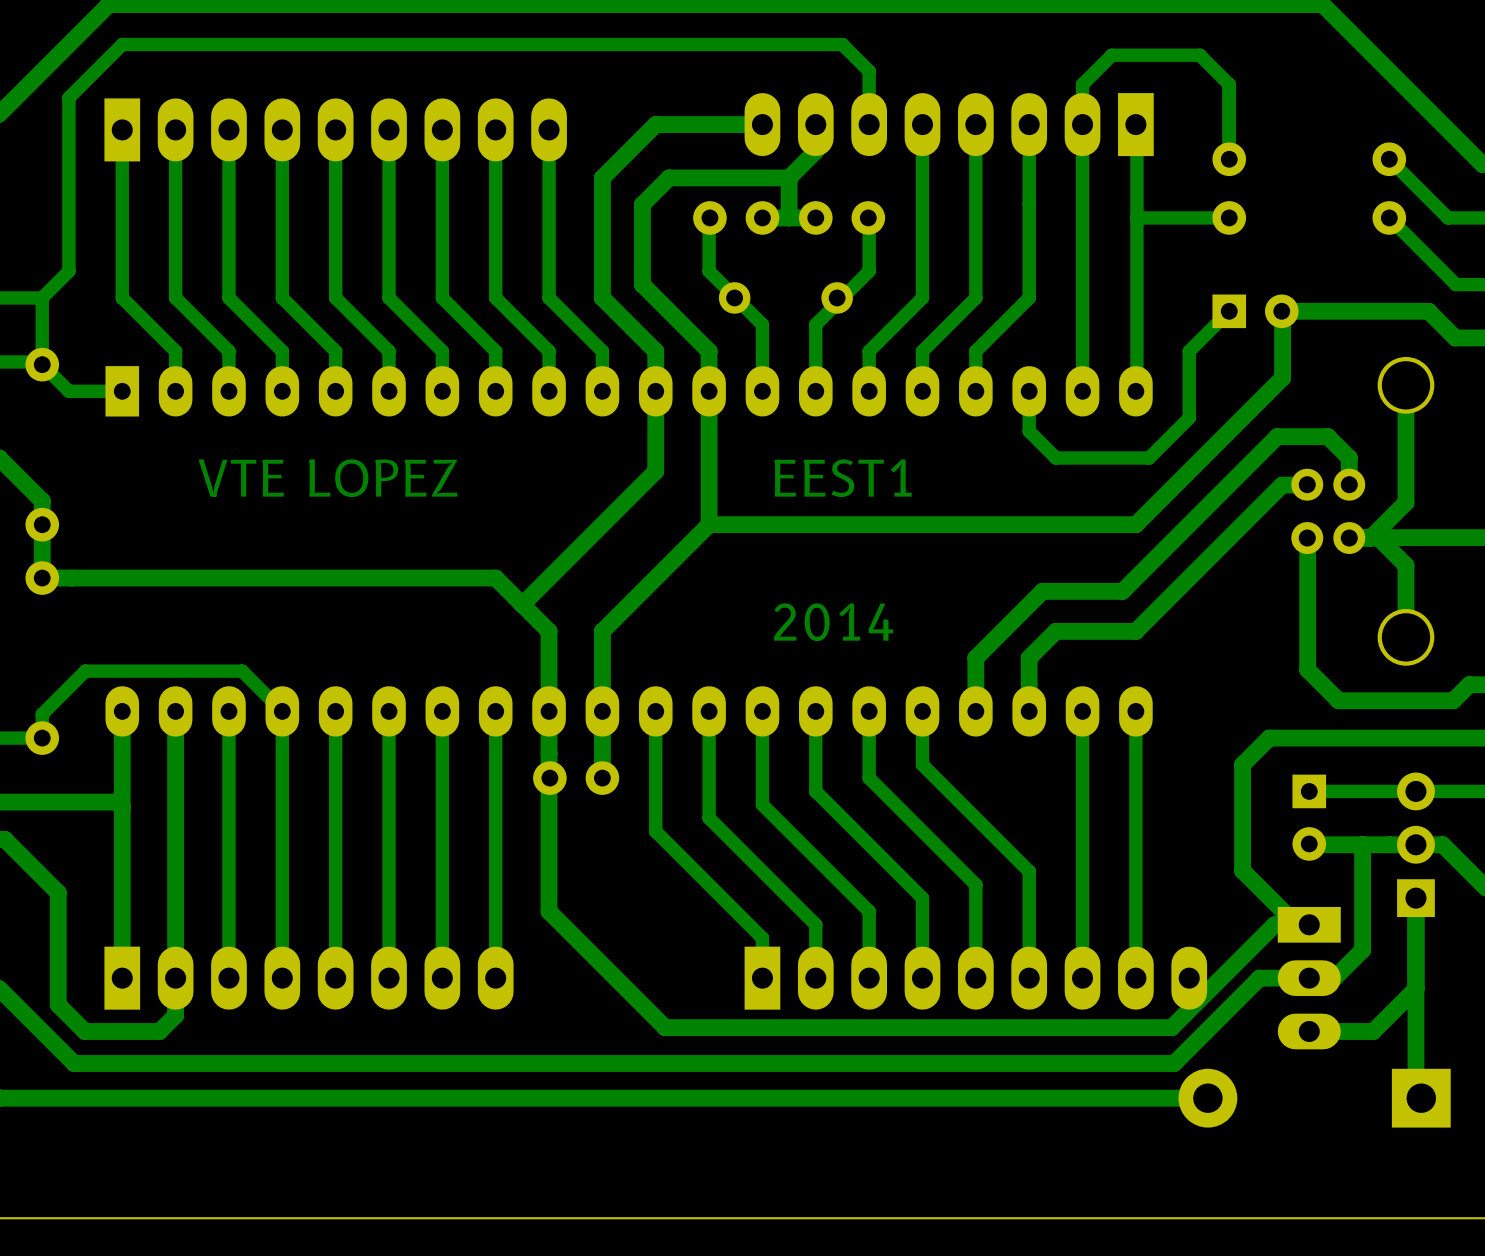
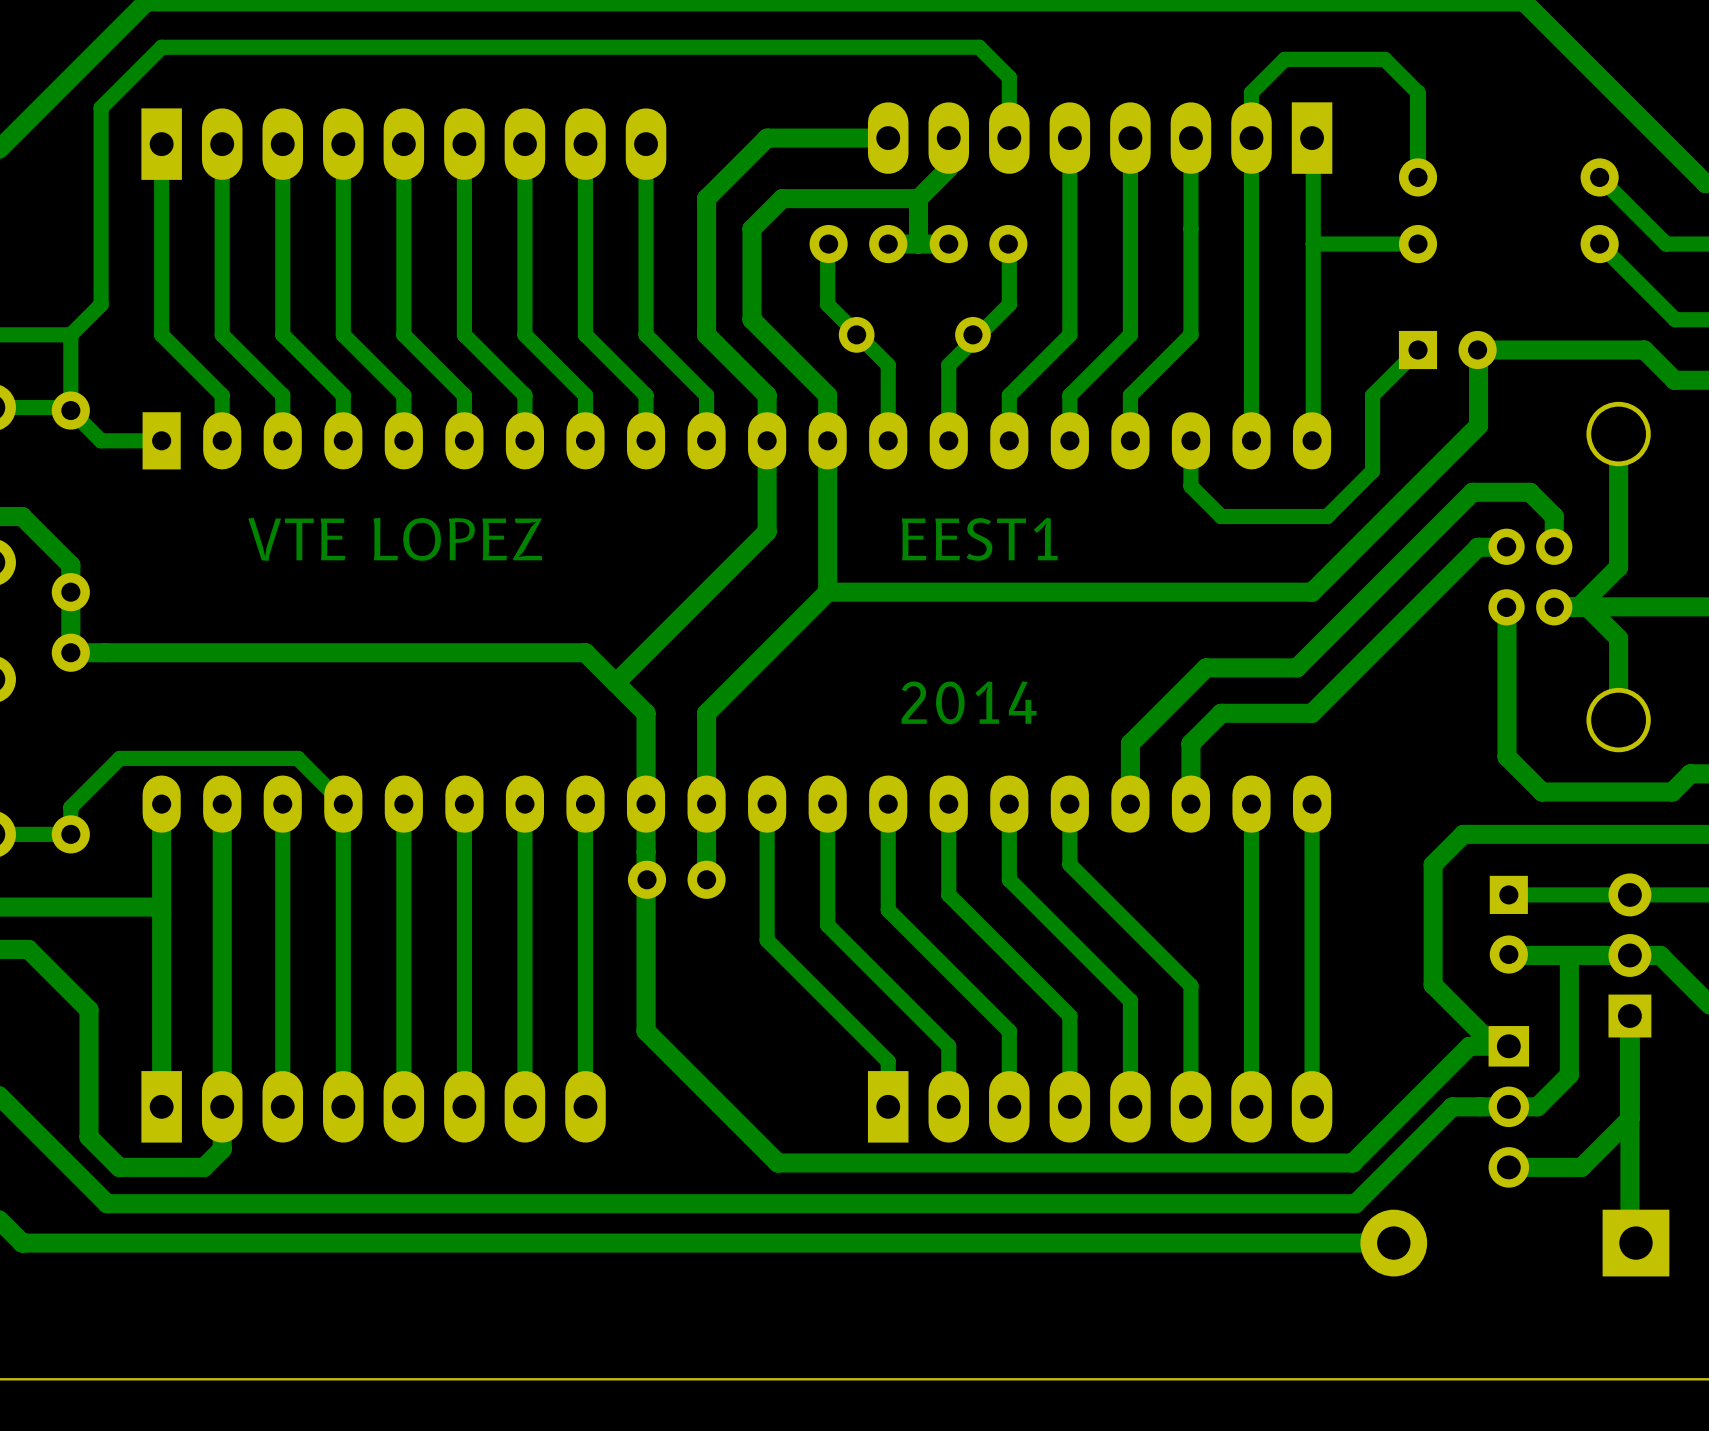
part footprint: [1277, 906, 1341, 1050] -> [1488, 1026, 1530, 1188]
part: (975, 978) -> none

